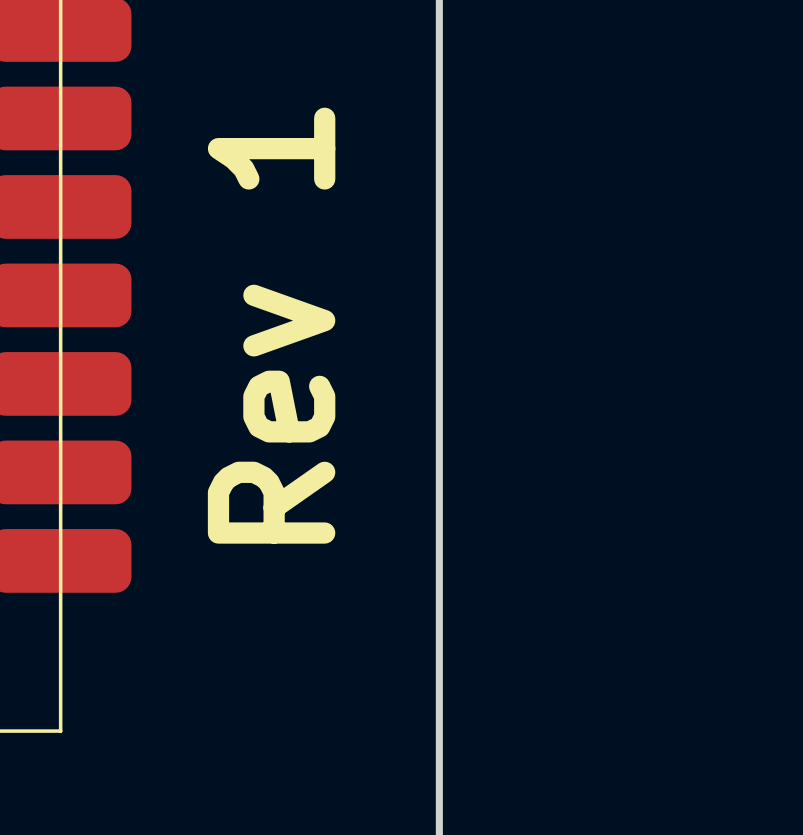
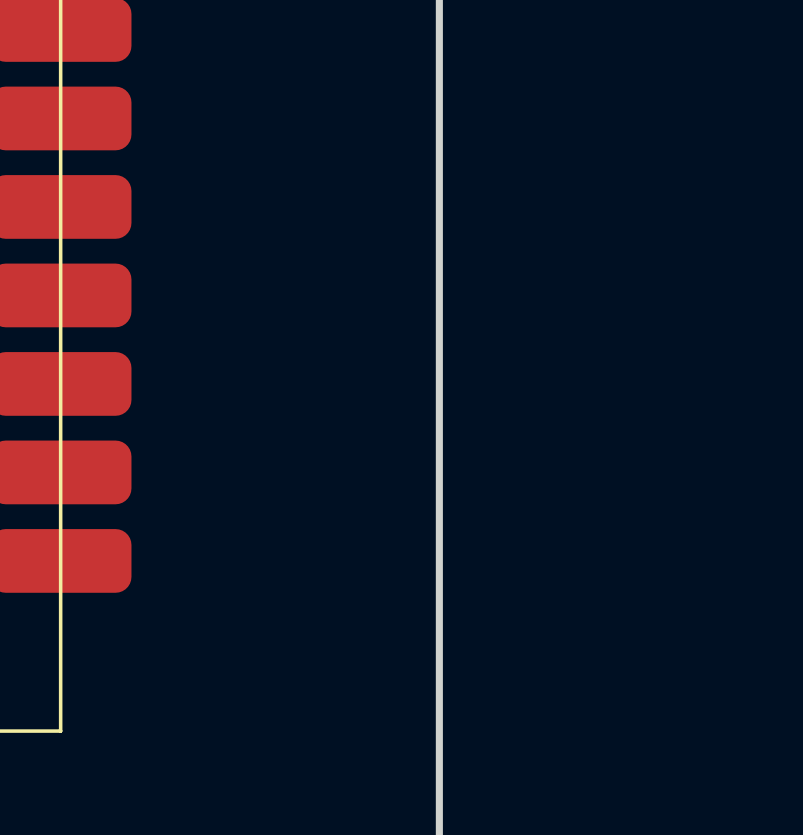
text: Rev 1 (271, 325) -> none

